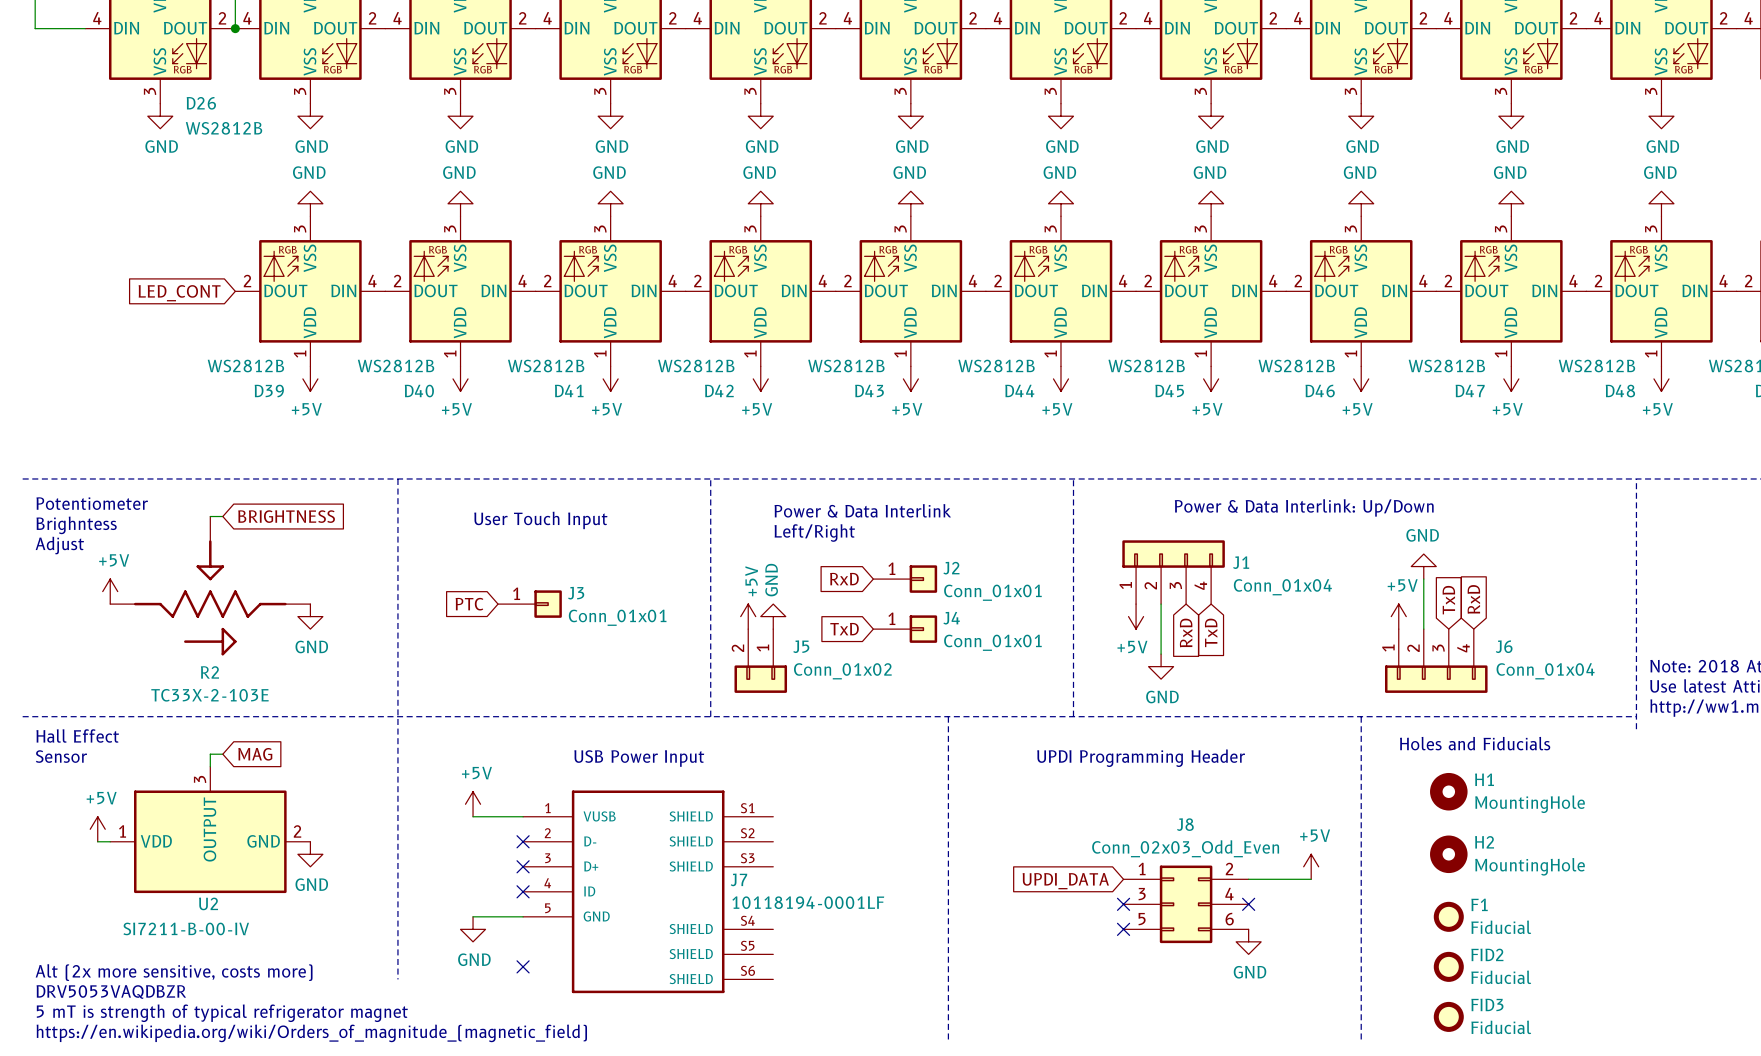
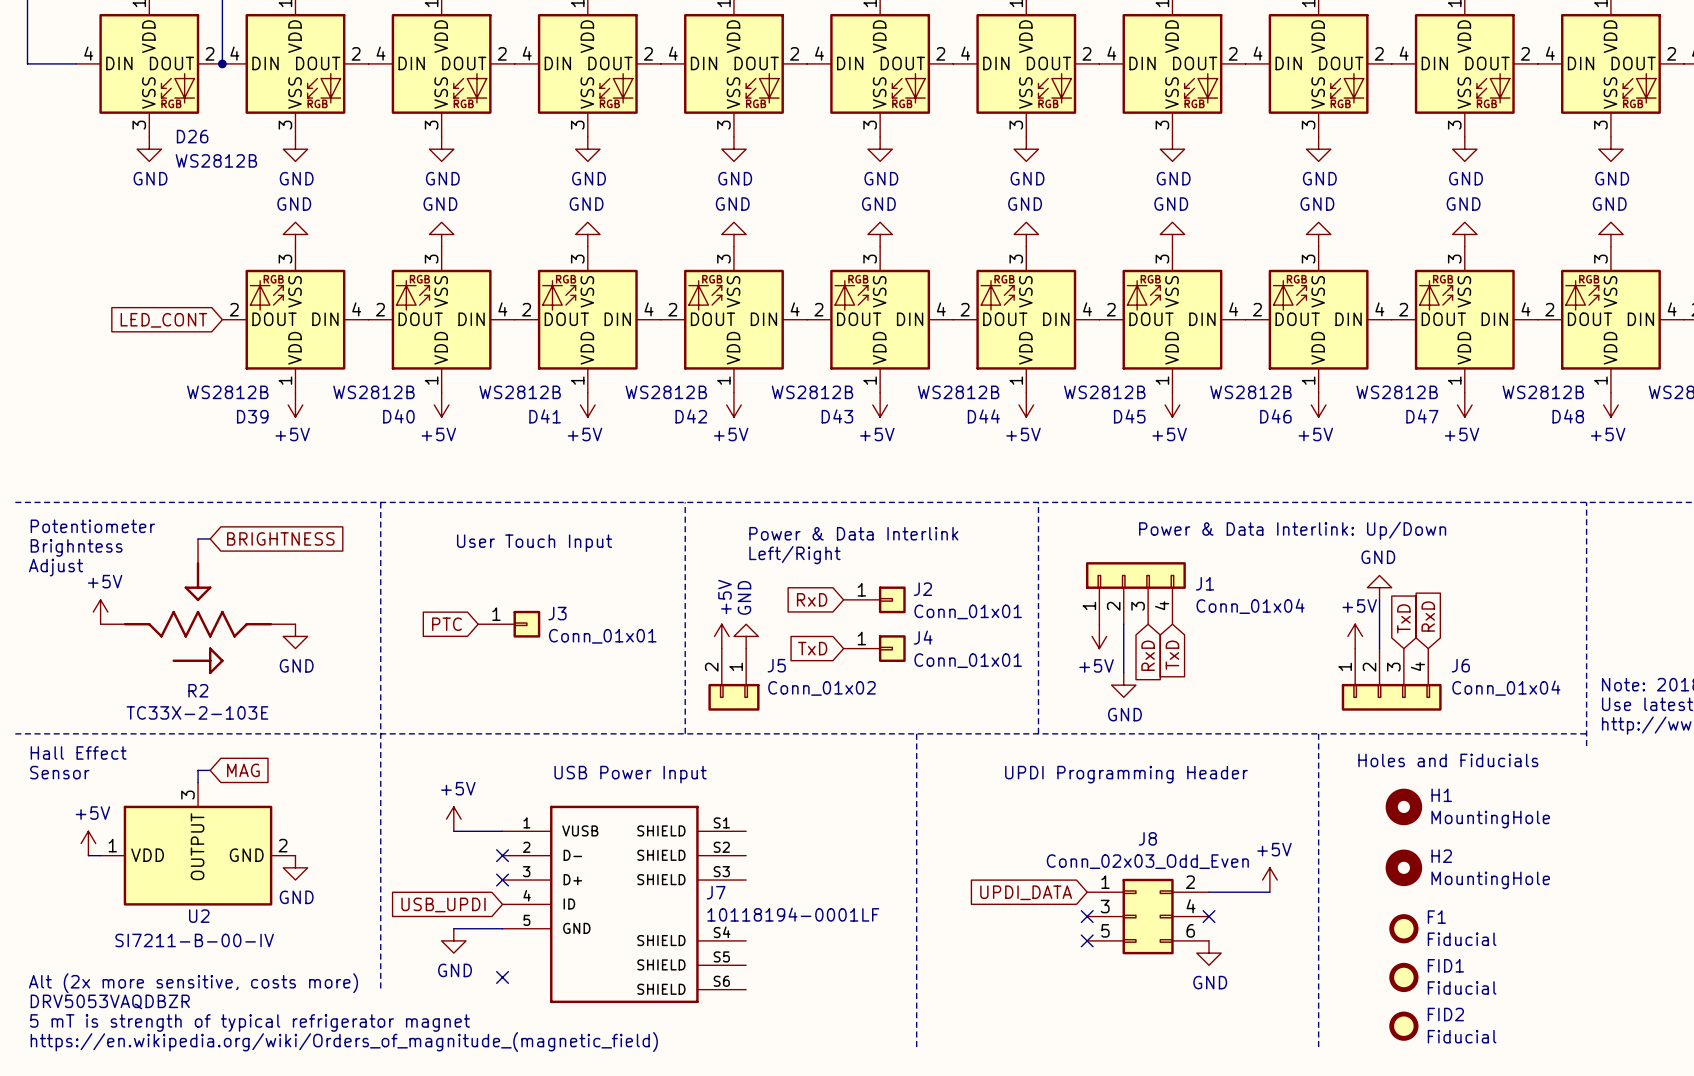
no-connect mark: (523, 891) -> none
global label: none -> USB_UPDI (443, 904)
FID2 name: FID2 (1487, 954) -> FID1 (1445, 965)
FID3 name: FID3 (1487, 1004) -> FID2 (1445, 1014)

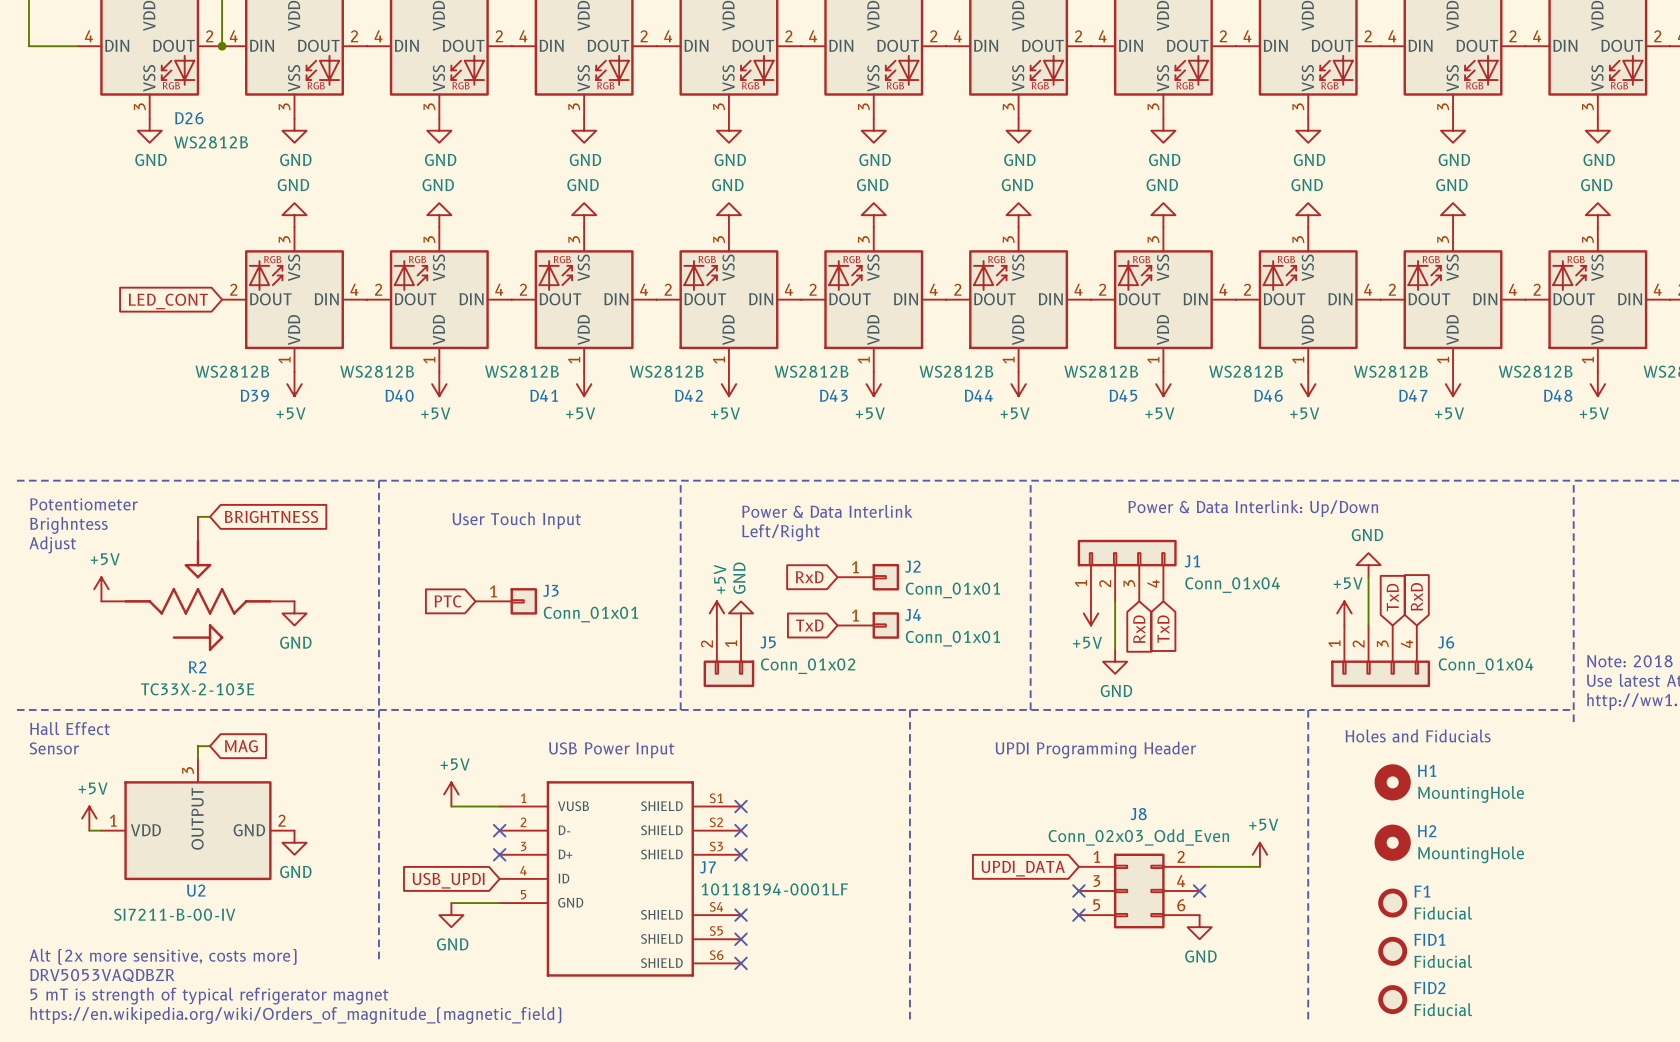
no-connect mark: none -> (741, 806)
no-connect mark: none -> (741, 830)
no-connect mark: none -> (741, 854)
no-connect mark: none -> (741, 915)
no-connect mark: none -> (741, 939)
no-connect mark: (502, 977) -> none
no-connect mark: none -> (741, 963)

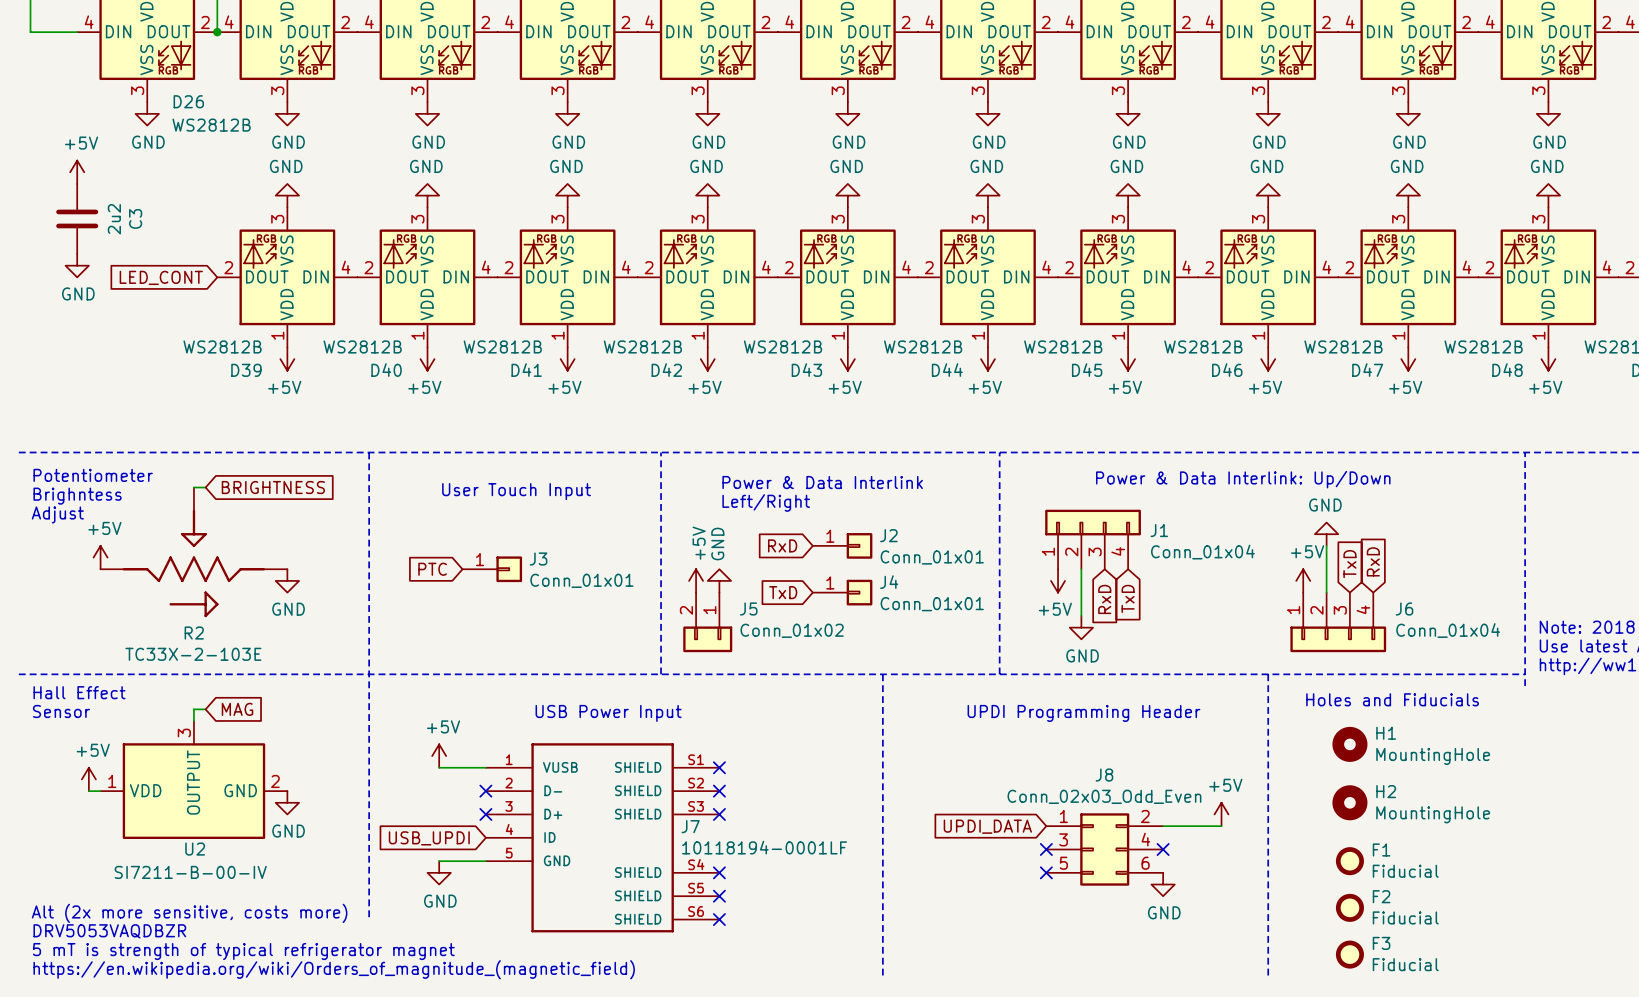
power symbol: none -> +5V (77, 172)
C3: none -> 2u2 (77, 218)
power symbol: none -> GND (77, 265)
FID1 name: FID1 (1429, 939) -> F2 (1381, 896)
FID2 name: FID2 (1429, 988) -> F3 (1381, 943)

